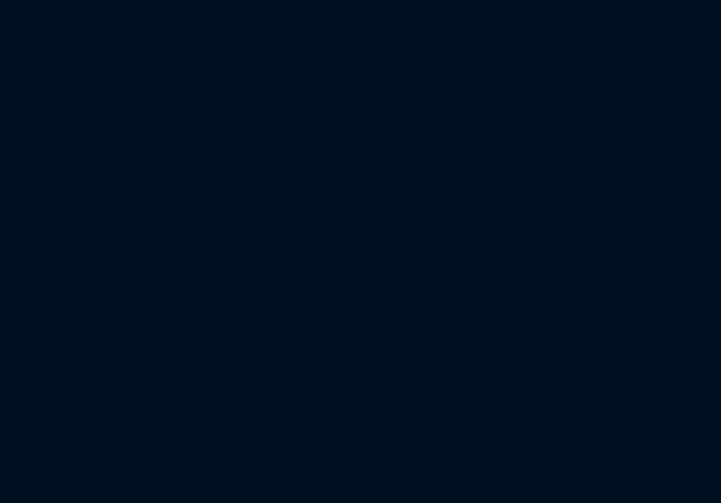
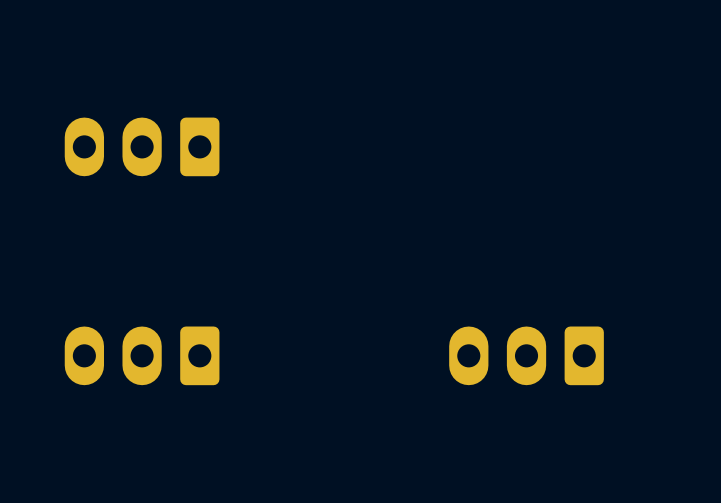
part: none -> (142, 146)
part: none -> (142, 355)
part: none -> (526, 355)

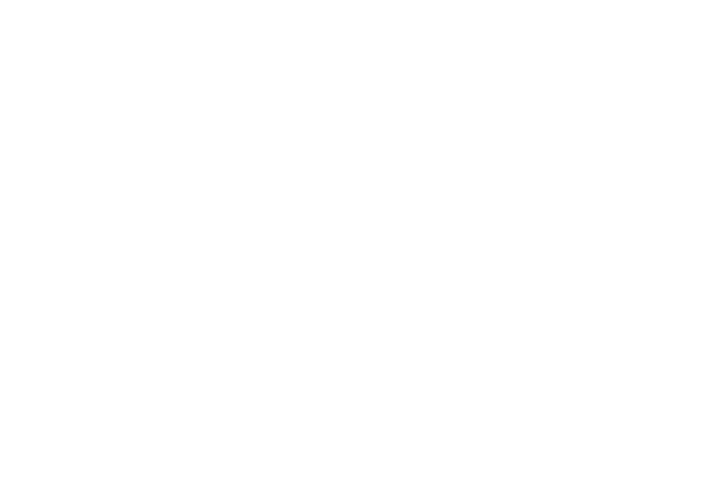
part: (142, 146) -> none
part: (142, 355) -> none
part: (526, 355) -> none

